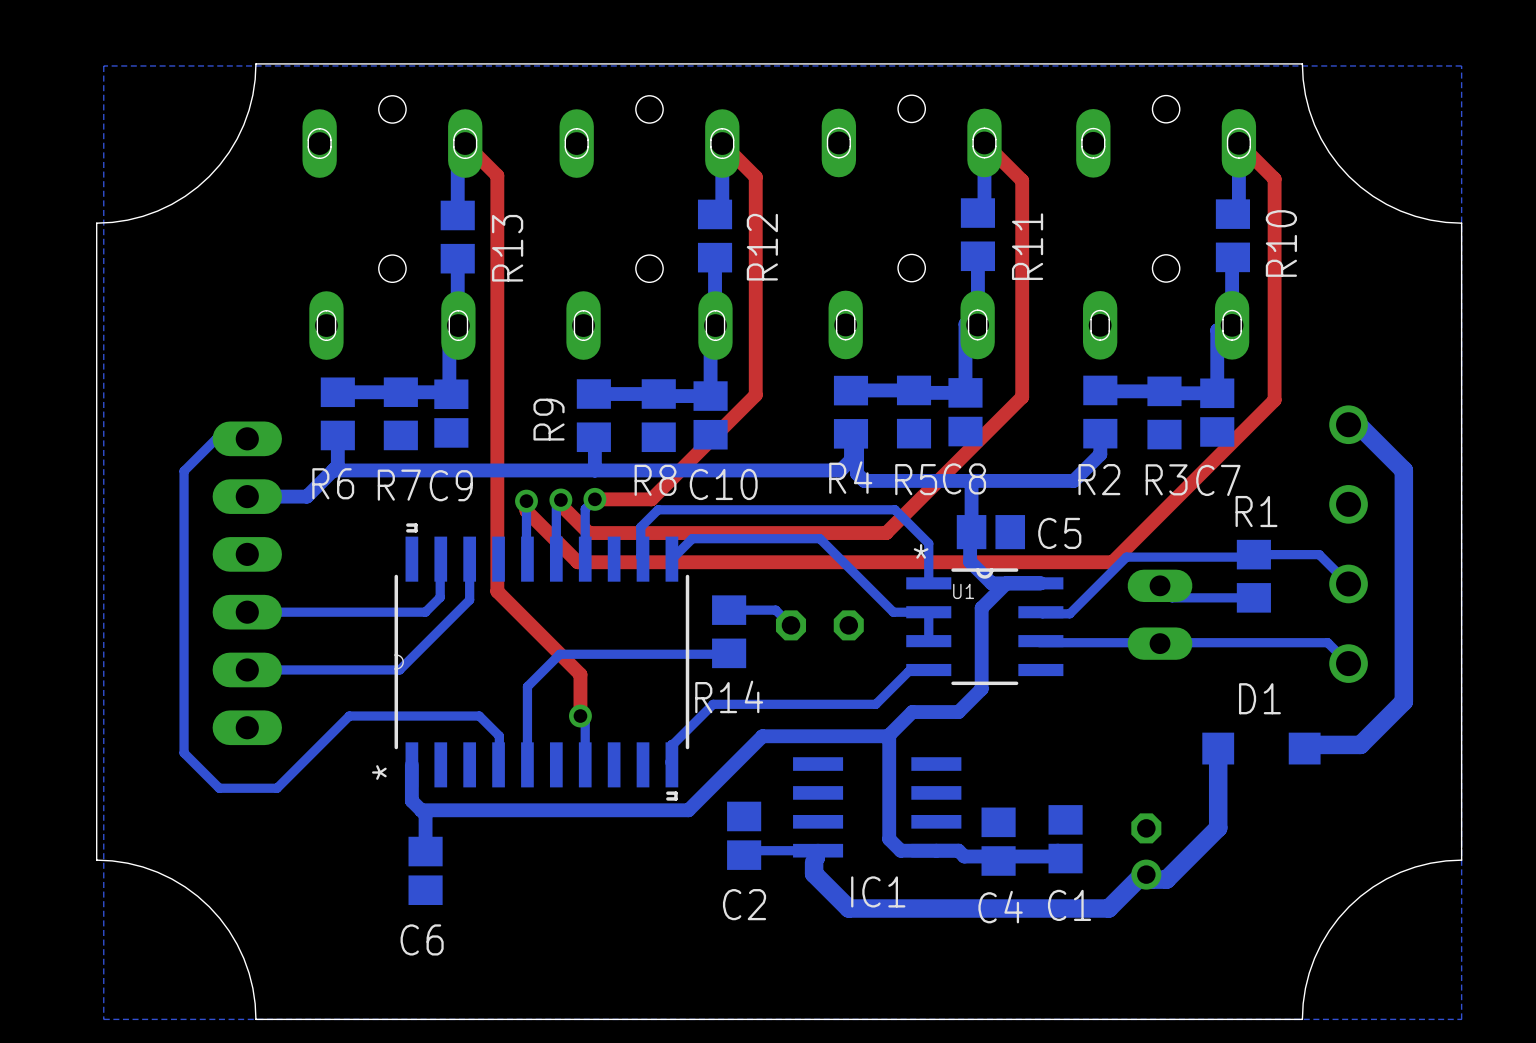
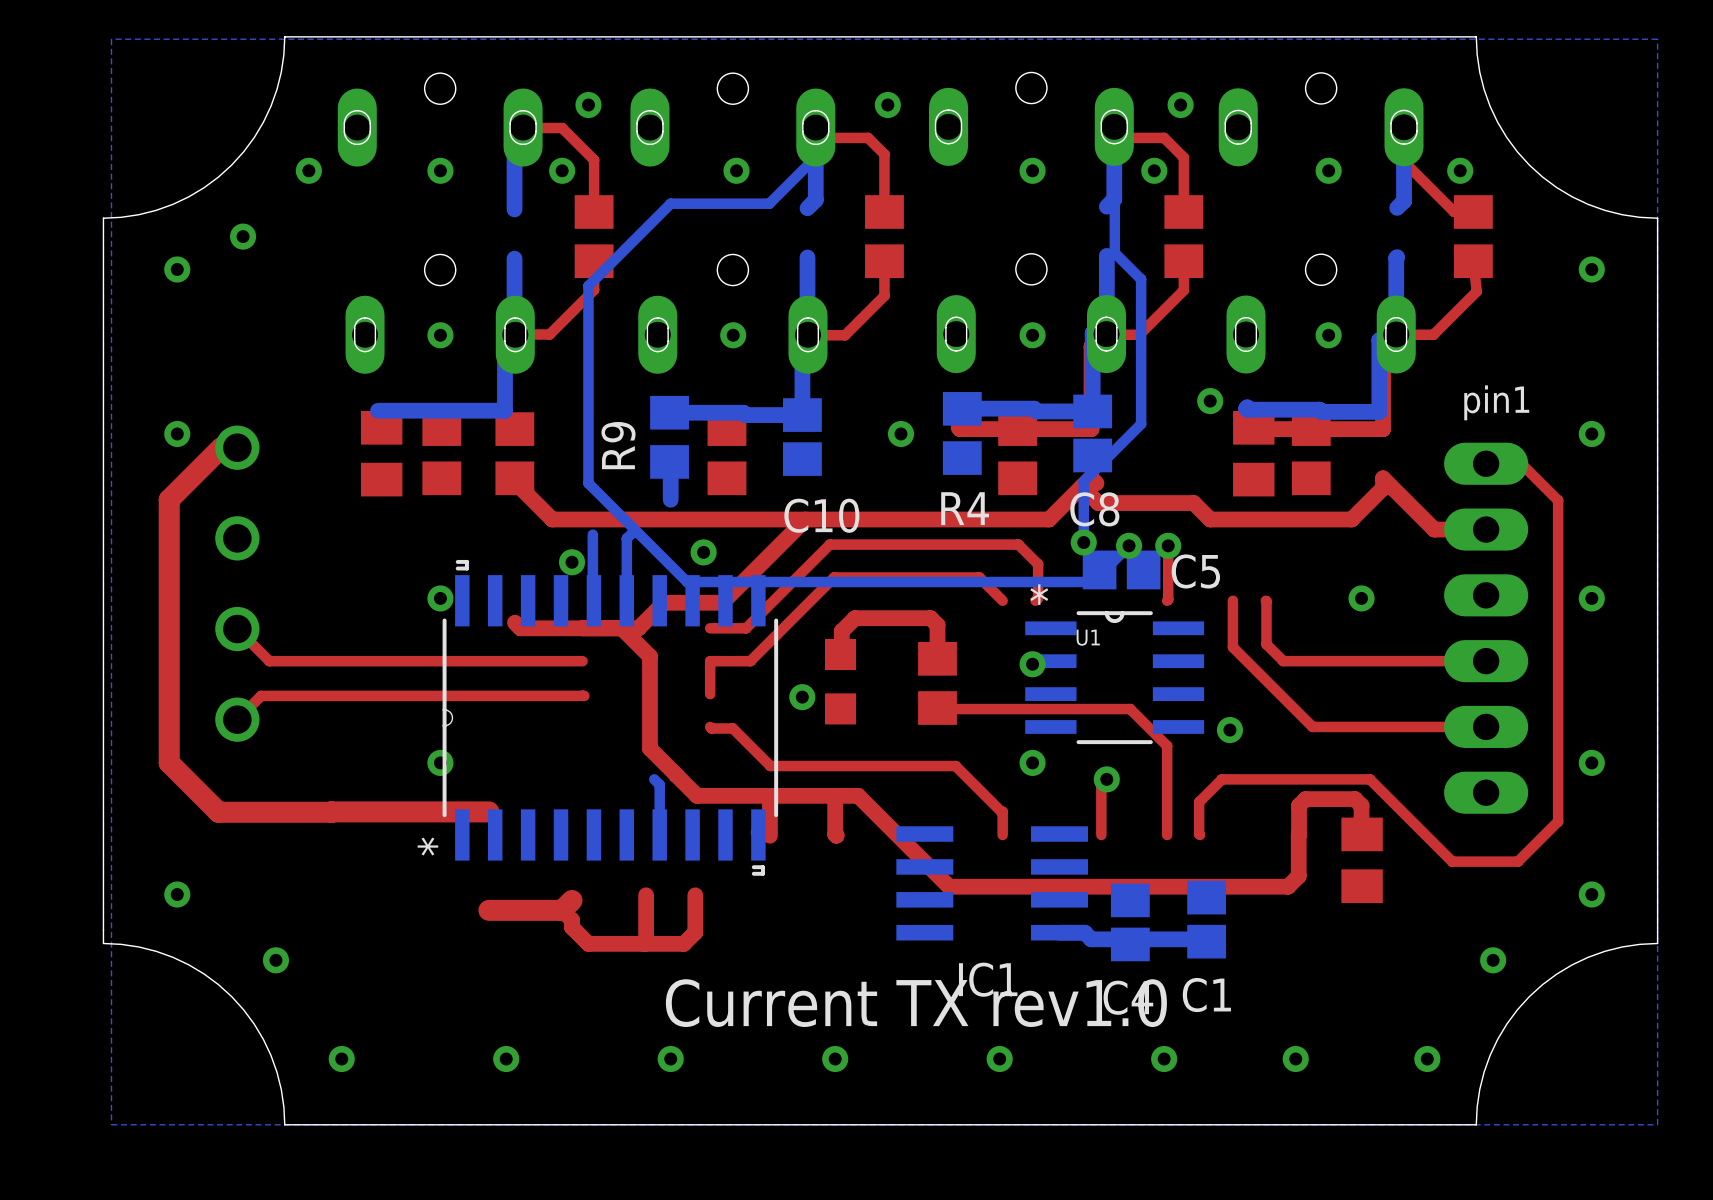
via: none -> (588, 105)
via: none -> (887, 105)
via: none -> (1180, 105)
bottom track: none -> (812, 126) (815, 129) (815, 157) (769, 203) (670, 203) (588, 285) (588, 483) (687, 582) (1092, 582) (1129, 545)
top track: none -> (812, 126) (823, 137) (868, 137) (884, 154) (884, 211)
top track: (984, 142) (1022, 180) (1022, 397) (886, 533) (588, 533) (560, 505) (560, 499) -> none
top track: (465, 143) (497, 175) (497, 591) (580, 674) (580, 716) -> none
top track: none -> (522, 127) (562, 128) (594, 160) (594, 211)
top track: (722, 143) (755, 177) (755, 395) (651, 499) (594, 499) -> none
bottom track: none -> (1111, 127) (1114, 131) (1114, 253) (1141, 279) (1141, 424) (1083, 481) (1083, 542)
top track: none -> (1111, 127) (1121, 137) (1164, 137) (1183, 157) (1183, 211)
top track: (1238, 143) (1274, 179) (1274, 400) (1112, 562) (577, 562) (526, 510) (526, 501) -> (1404, 128) (1403, 161) (1454, 211) (1473, 211)
via: none -> (308, 170)
via: none -> (440, 170)
via: none -> (562, 170)
via: none -> (736, 170)
via: none -> (1032, 170)
via: none -> (1154, 170)
via: none -> (1328, 170)
via: none -> (1460, 170)
R11 side: bottom (977, 234) -> top (884, 236)
R10: (1232, 235) -> none
R12 side: bottom (715, 236) -> top (1183, 236)
R13: (457, 237) -> none
via: none -> (243, 236)
part: none -> (594, 236)
part: none -> (1473, 236)
top track: none -> (594, 261) (594, 290) (549, 334) (513, 335)
top track: none -> (884, 261) (884, 295) (845, 335) (804, 334)
top track: none -> (1183, 261) (1183, 290) (1139, 334) (1103, 334) (1091, 346) (1091, 429) (958, 427)
top track: none -> (1473, 261) (1476, 291) (1433, 334) (1395, 334) (1383, 347) (1383, 429) (1253, 427)
via: none -> (177, 269)
via: none -> (1591, 269)
via: none -> (440, 335)
via: none -> (733, 335)
via: none -> (1032, 335)
via: none -> (1328, 335)
via: none -> (1210, 401)
text: none -> pin1 (1496, 402)
via: none -> (177, 433)
via: none -> (900, 433)
R5 side: bottom (914, 412) -> top (726, 453)
R2: (1100, 412) -> none
R3: (1164, 412) -> none
C7: (1217, 412) -> none
via: none -> (1591, 433)
R6: (337, 413) -> none
R7: (400, 413) -> none
C9: (451, 413) -> none
R8 side: bottom (658, 415) -> top (1017, 453)
top track: none -> (237, 447) (221, 447) (169, 499) (169, 762) (218, 812) (331, 812)
bottom track: (1348, 424) (1358, 424) (1403, 470) (1403, 701) (1360, 744) (1308, 744) (1304, 748) -> none
part: none -> (381, 453)
part: none -> (441, 453)
part: none -> (514, 453)
part: none -> (1253, 453)
part: none -> (1311, 453)
bottom track: (1100, 433) (1100, 454) (1073, 480) (864, 480) (857, 473) (857, 441) (850, 433) (850, 459) (840, 470) (333, 469) -> none
bottom track: (337, 435) (337, 465) (306, 496) (247, 496) -> none
bottom track: (247, 438) (216, 438) (184, 471) (184, 753) (219, 788) (277, 788) (349, 716) (479, 716) (499, 736) (498, 764) -> none
top track: none -> (1486, 463) (1521, 463) (1558, 500) (1558, 821) (1517, 861) (1452, 861) (1369, 779) (1221, 779) (1199, 802) (1200, 834)
top track: none -> (514, 478) (514, 482) (552, 519) (1049, 519) (1090, 478) (1096, 483)
top track: none -> (1081, 486) (1098, 503) (1193, 503) (1210, 519) (1351, 519) (1383, 488) (1383, 478) (1434, 529) (1486, 529)
bottom track: (970, 480) (970, 561) (991, 583) (1040, 583) -> none
top track: none -> (805, 519) (722, 602) (664, 602) (638, 628) (520, 628) (514, 622)
via: (560, 499) -> none
bottom track: (594, 499) (585, 509) (585, 559) -> none
via: (594, 499) -> none
via: (526, 501) -> none
via: none -> (1083, 542)
via: none -> (1129, 545)
top track: none -> (1168, 545) (1167, 600)
via: none -> (1168, 545)
via: none -> (703, 552)
via: none -> (572, 562)
part: none -> (237, 583)
part: (1348, 544) -> none
via: none -> (440, 598)
via: none -> (1361, 598)
via: none -> (1591, 598)
bottom track: (440, 559) (440, 597) (425, 612) (247, 612) -> none
bottom track: (469, 559) (469, 600) (399, 669) (247, 669) -> none
bottom track: (643, 559) (640, 556) (640, 527) (658, 509) (895, 509) (928, 543) (928, 583) -> none
bottom track: (671, 559) (692, 538) (819, 538) (893, 612) (928, 612) (928, 641) -> none
top track: none -> (1002, 600) (979, 577) (834, 577) (750, 661) (710, 661) (710, 694)
top track: none -> (1035, 600) (1038, 598) (1038, 564) (1018, 544) (829, 544) (746, 628) (710, 628)
top track: none -> (1232, 600) (1232, 647) (1312, 726) (1486, 726)
top track: none -> (1265, 600) (1266, 644) (1283, 661) (1486, 661)
R1: (1253, 576) -> none
bottom track: (1162, 580) (1160, 585) (1172, 597) (1253, 597) -> none
top track: none -> (237, 629) (269, 661) (582, 661)
part: (247, 583) -> none
top track: none -> (621, 628) (649, 656) (649, 748) (697, 795) (835, 795) (836, 797)
bottom track: (1006, 583) (981, 608) (981, 688) (958, 712) (912, 712) (888, 736) (762, 736) (688, 810) (421, 810) -> none
part: none -> (1486, 628)
bottom track: (1344, 583) (1348, 583) (1319, 554) (1253, 554) (1251, 557) (1126, 557) (1069, 613) (1040, 612) -> none
top track: none -> (840, 654) (841, 631) (854, 618) (930, 618) (937, 625) (937, 658)
bottom track: (729, 610) (775, 610) (790, 625) -> none
part footprint: [775, 610, 864, 641] -> [918, 641, 957, 725]
via: none -> (1032, 664)
part: (1160, 614) -> none
part: none -> (840, 681)
R14: (729, 631) -> none
top track: none -> (582, 694) (584, 695) (261, 695) (237, 719)
bottom track: (1040, 641) (1039, 642) (1327, 642) (1348, 663) -> none
via: none -> (802, 697)
bottom track: (729, 653) (559, 654) (527, 686) (527, 764) -> none
top track: none -> (937, 708) (1130, 709) (1167, 745) (1167, 834)
top track: none -> (710, 726) (732, 728) (770, 766) (955, 766) (1002, 811) (1002, 834)
bottom track: (928, 670) (908, 671) (875, 704) (713, 704) (671, 744) (671, 764) (668, 761) -> none
via: none -> (1229, 730)
via: none -> (440, 762)
via: none -> (1032, 762)
via: none -> (1591, 762)
via: (580, 716) -> none
top track: none -> (1106, 779) (1101, 784) (1101, 834)
via: none -> (1106, 779)
top track: none -> (769, 795) (769, 835)
bottom track: (889, 735) (889, 839) (900, 850) (936, 850) -> none
top track: none -> (488, 811) (331, 811)
bottom track: (1218, 748) (1218, 827) (1166, 879) (1151, 879) (1146, 874) -> none
D1: (1261, 748) -> none
bottom track: (411, 764) (411, 800) (425, 814) (425, 851) -> none
top track: none -> (1298, 834) (1298, 876) (1288, 886) (949, 886) (858, 795) (838, 795) (835, 799) (835, 834) (836, 835)
top track: none -> (1362, 834) (1361, 805) (1354, 799) (1305, 799) (1299, 805) (1299, 834)
part: none -> (1362, 860)
via: none -> (177, 894)
top track: none -> (646, 895) (646, 942) (644, 943)
top track: none -> (695, 895) (695, 932) (683, 943) (588, 943) (572, 927) (572, 920) (562, 910)
via: none -> (1591, 894)
top track: none -> (572, 900) (562, 910)
top track: none -> (562, 910) (488, 910)
C2: (744, 835) -> none
part: (1146, 851) -> none
bottom track: (744, 855) (748, 850) (818, 850) (818, 858) (814, 862) (814, 873) (848, 908) (1108, 908) (1142, 874) (1146, 874) -> none
C6: (425, 870) -> none
via: none -> (275, 960)
via: none -> (1493, 960)
text: none -> Current TX rev1.0 (916, 1003)
via: none -> (341, 1059)
via: none -> (506, 1059)
via: none -> (670, 1059)
via: none -> (835, 1059)
via: none -> (999, 1059)
via: none -> (1164, 1059)
via: none -> (1295, 1059)
via: none -> (1427, 1059)

